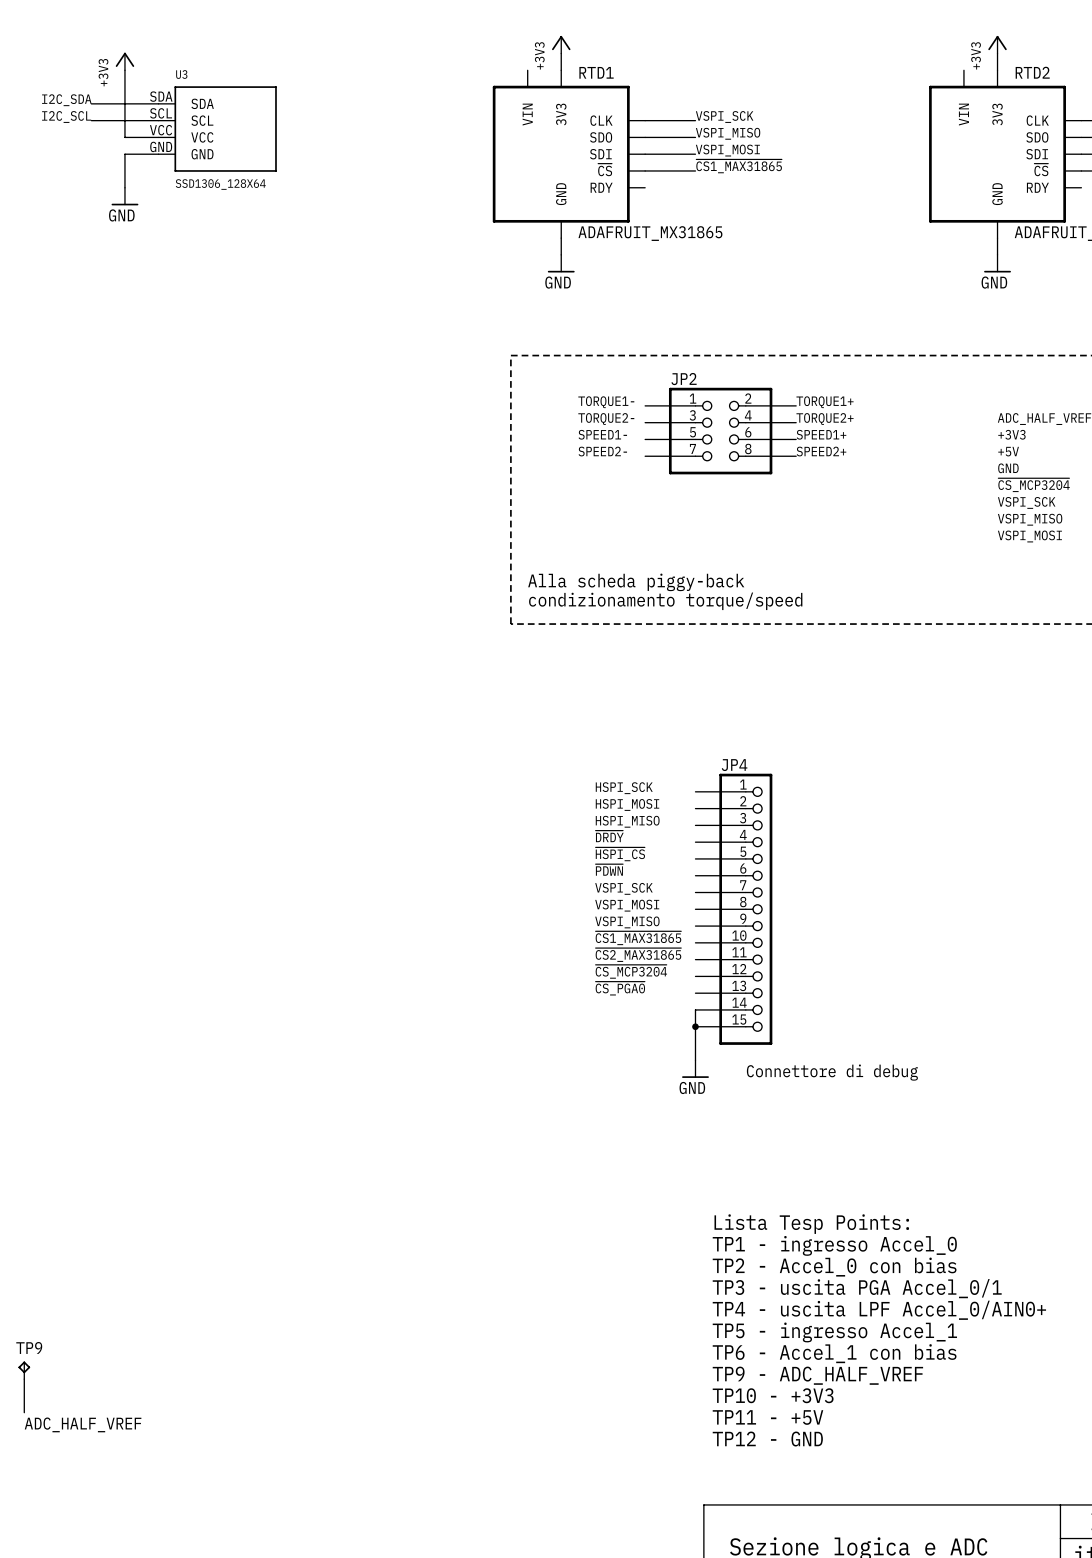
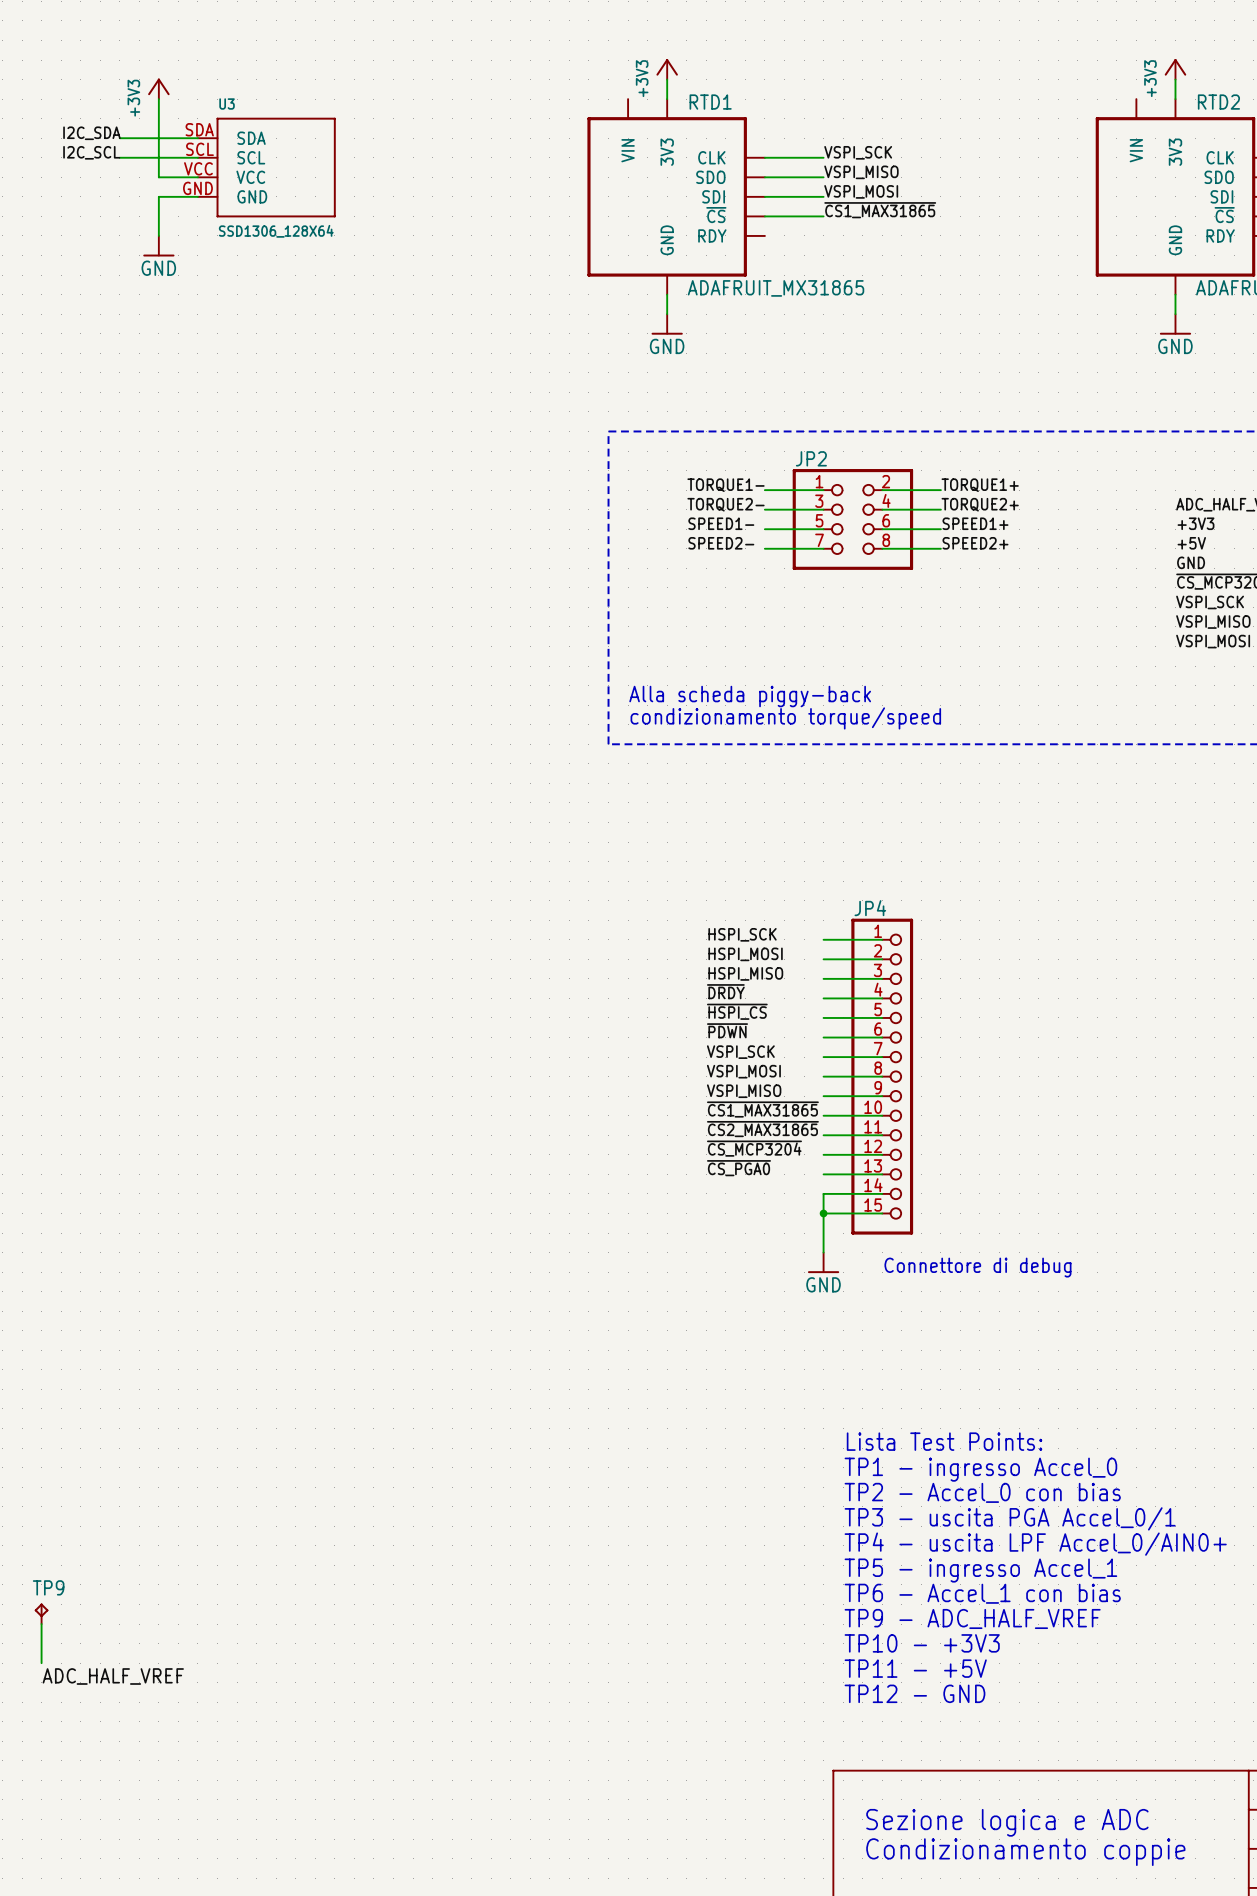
text: Lista Tesp Points: (811, 1224) -> Lista Test Points: (944, 1441)

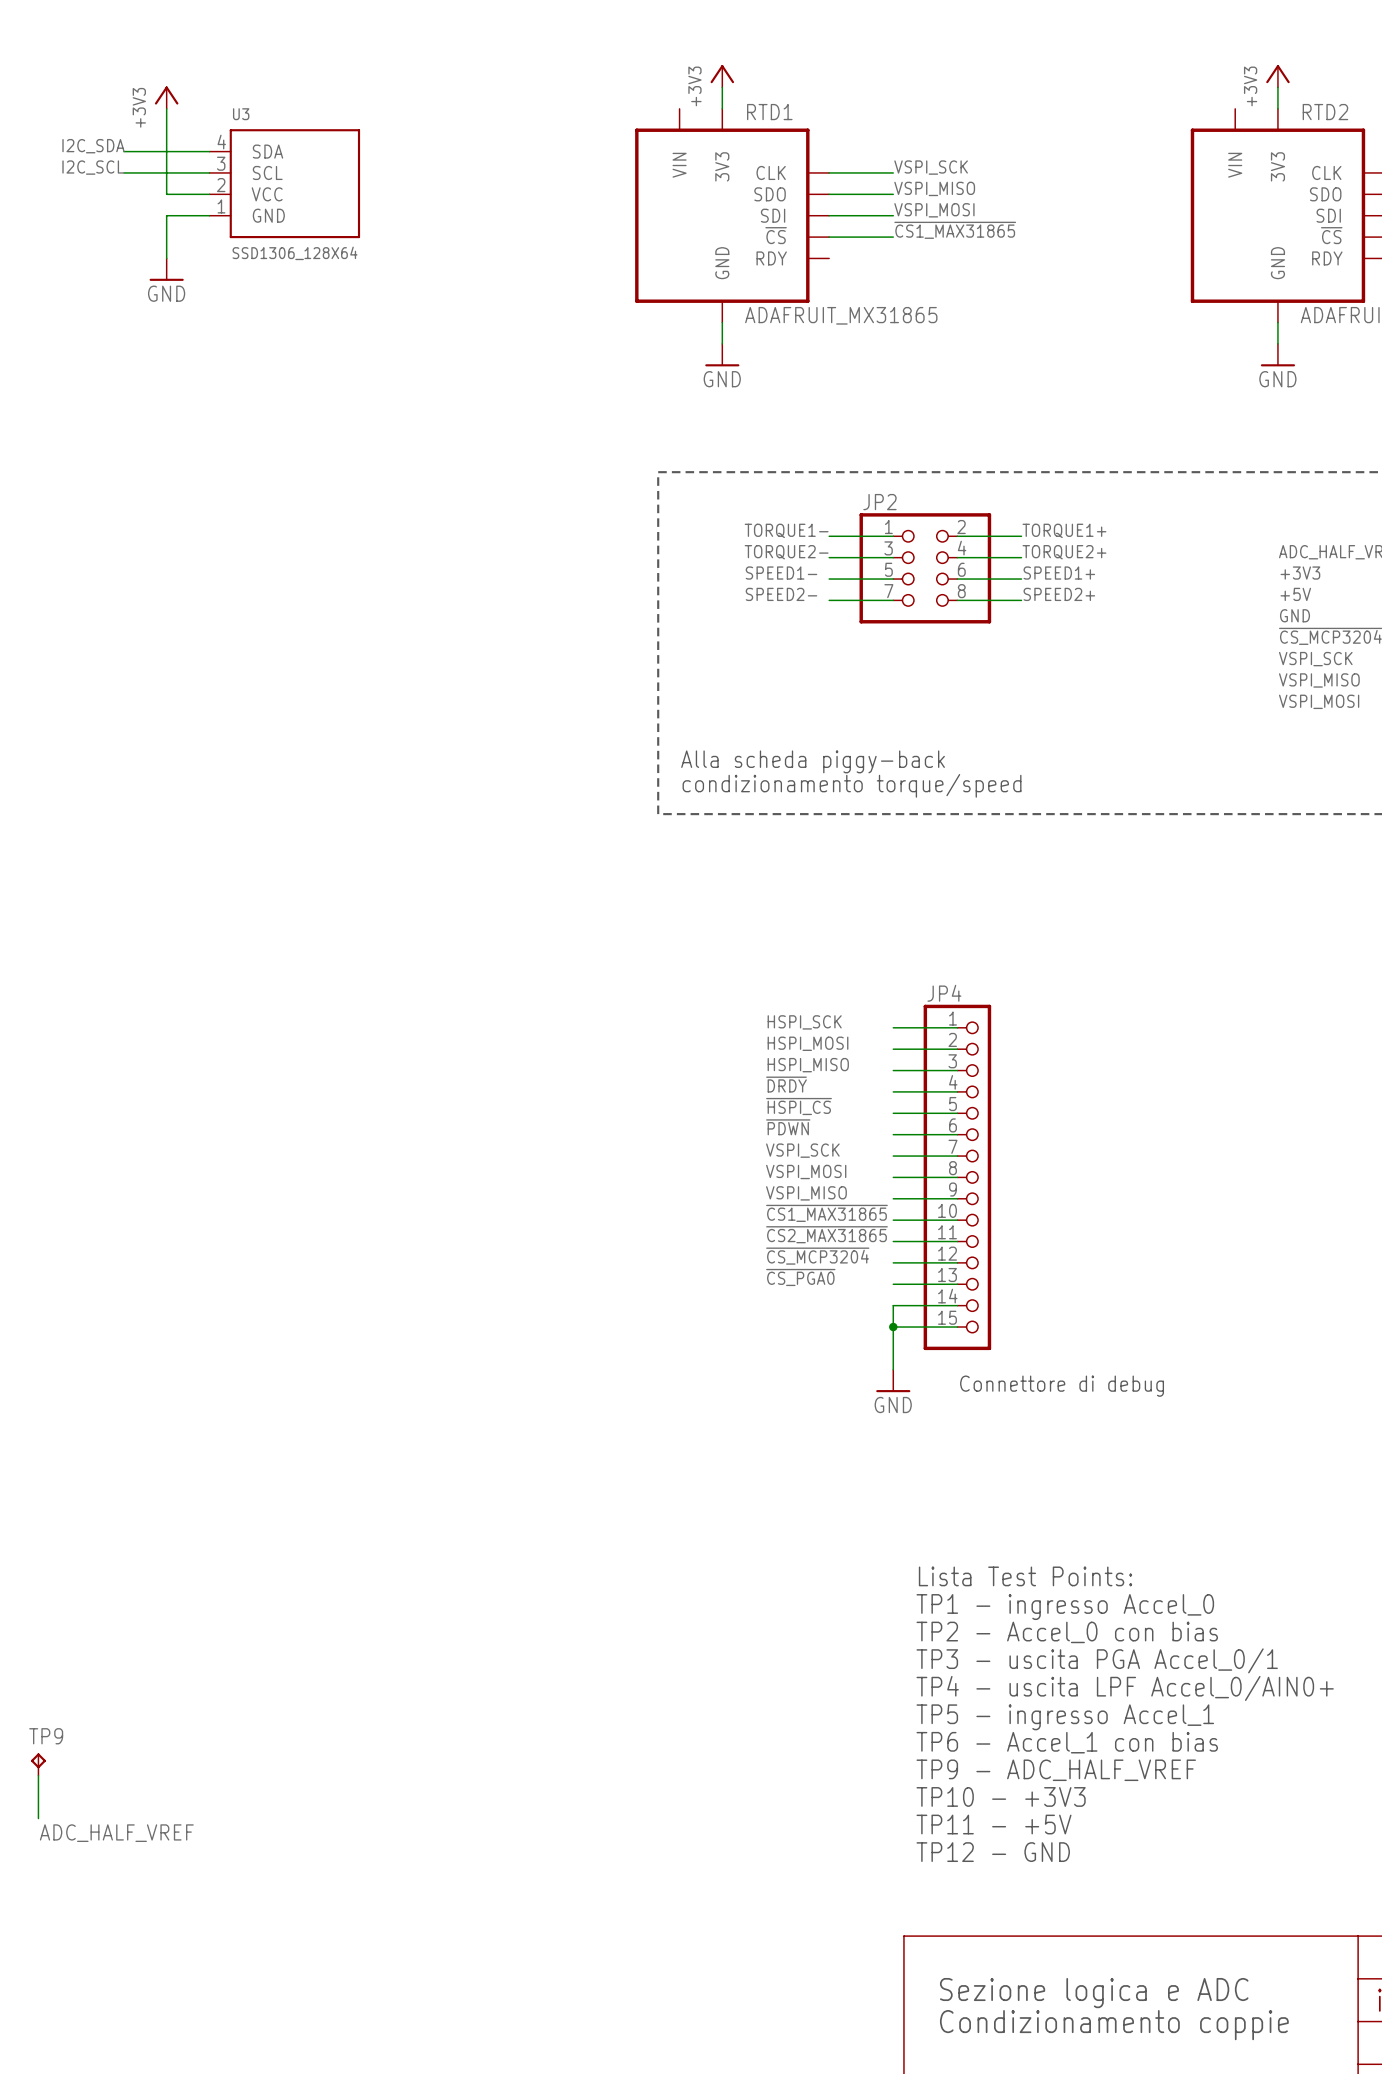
U3 pin number: SDA (199, 129) -> 4 (221, 142)
U3 pin number: SCL (199, 149) -> 3 (221, 163)
U3 pin number: VCC (198, 168) -> 2 (221, 185)
U3 pin number: GND (197, 188) -> 1 (221, 206)

